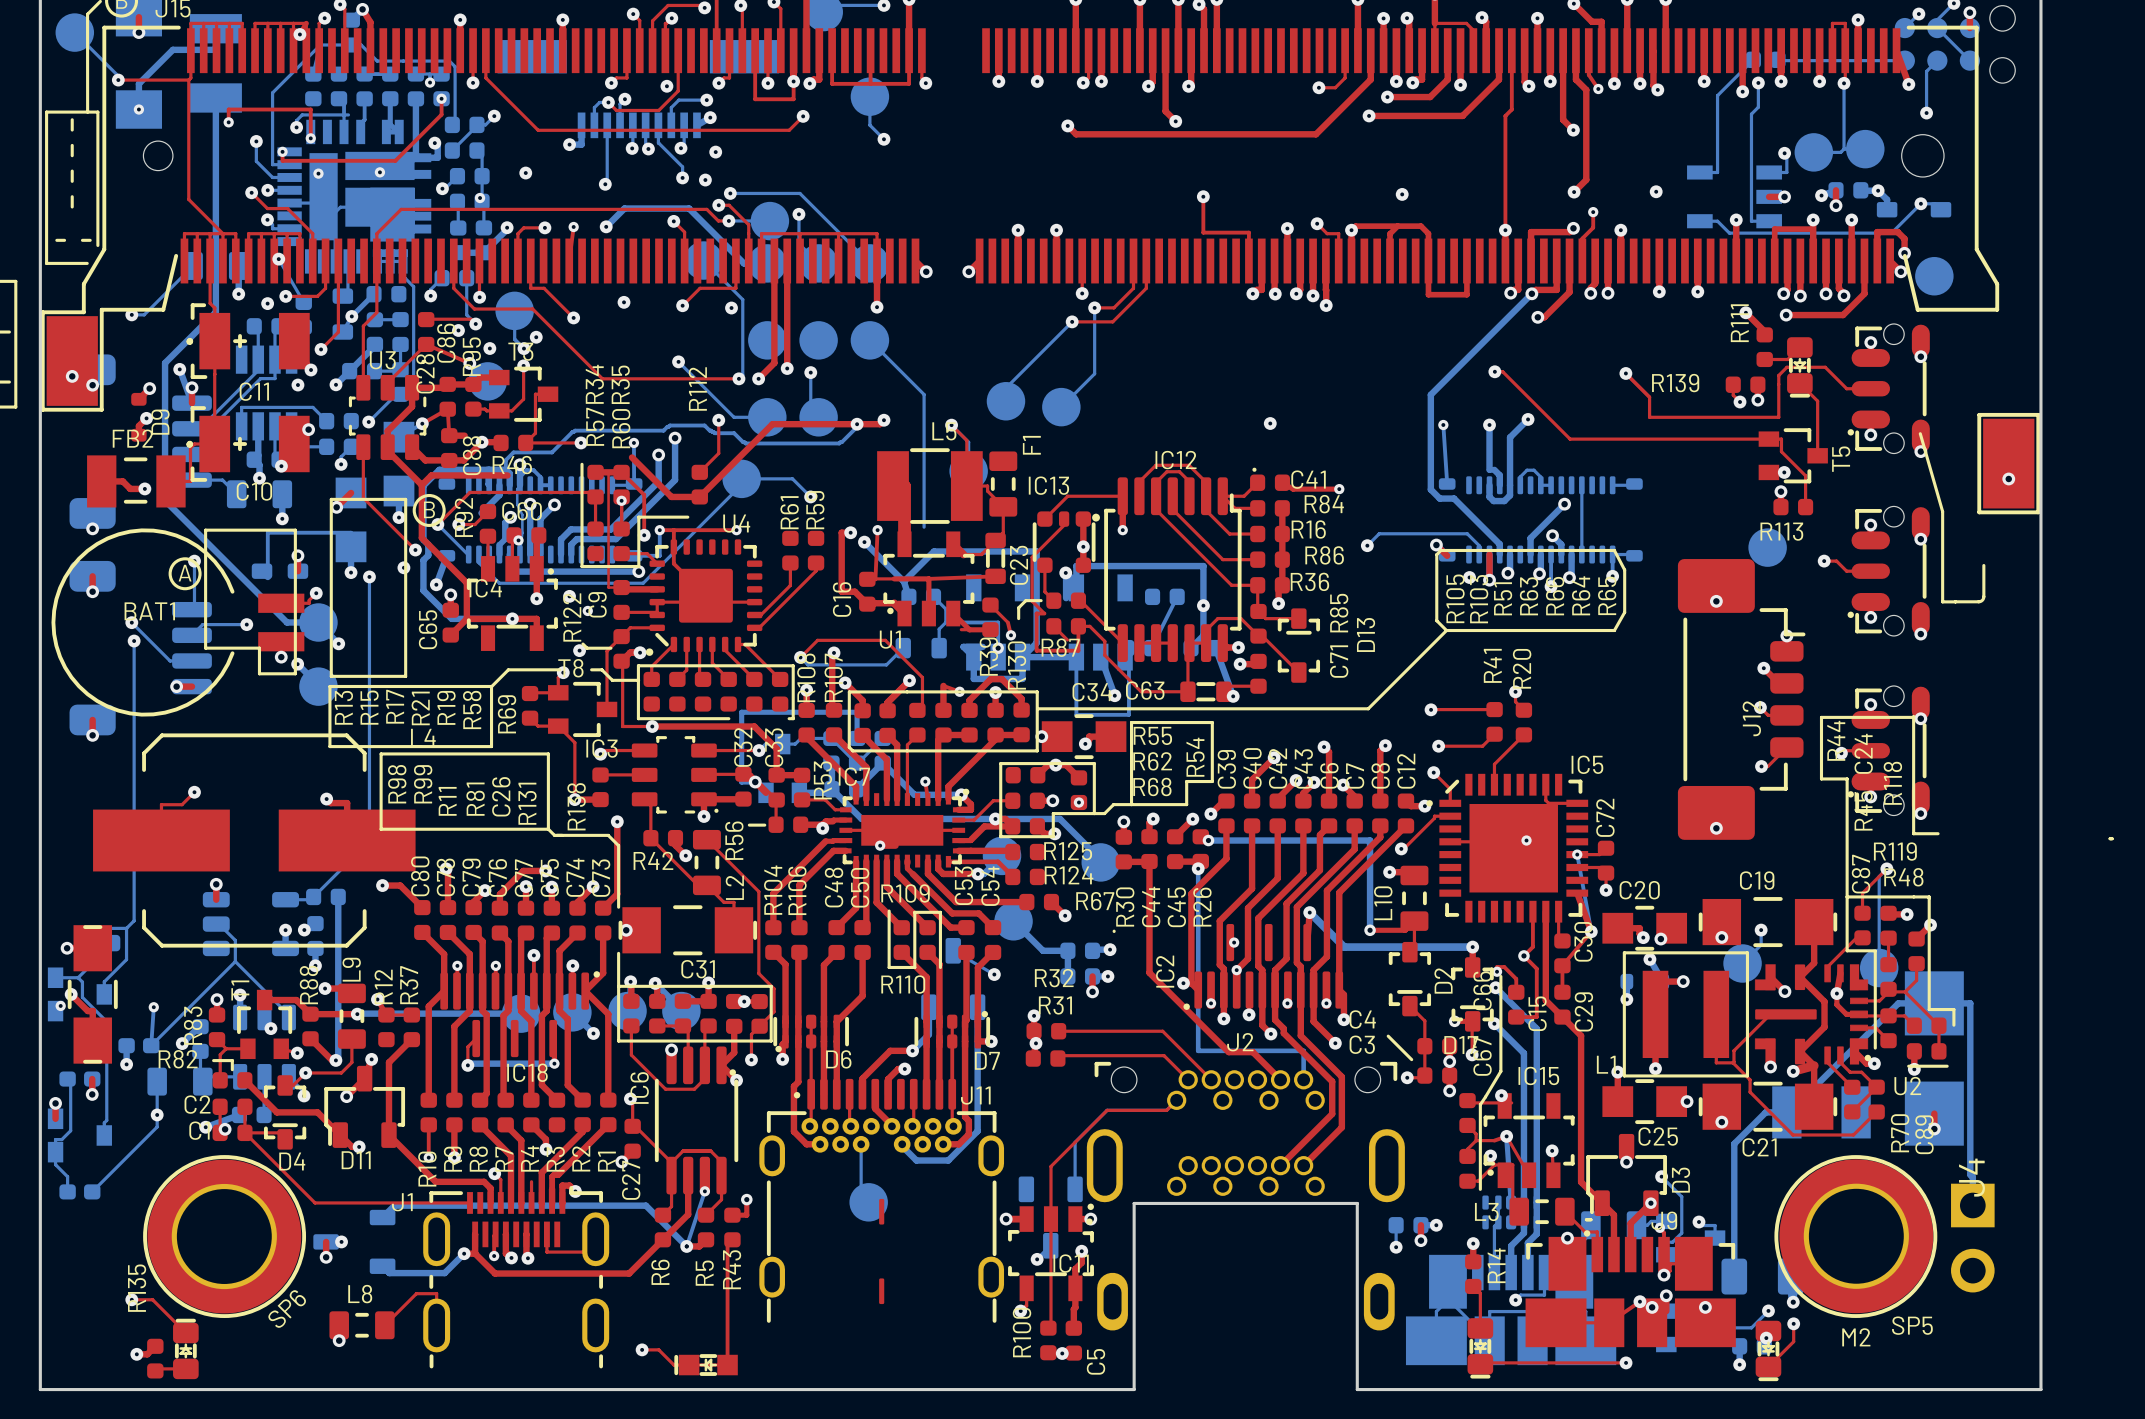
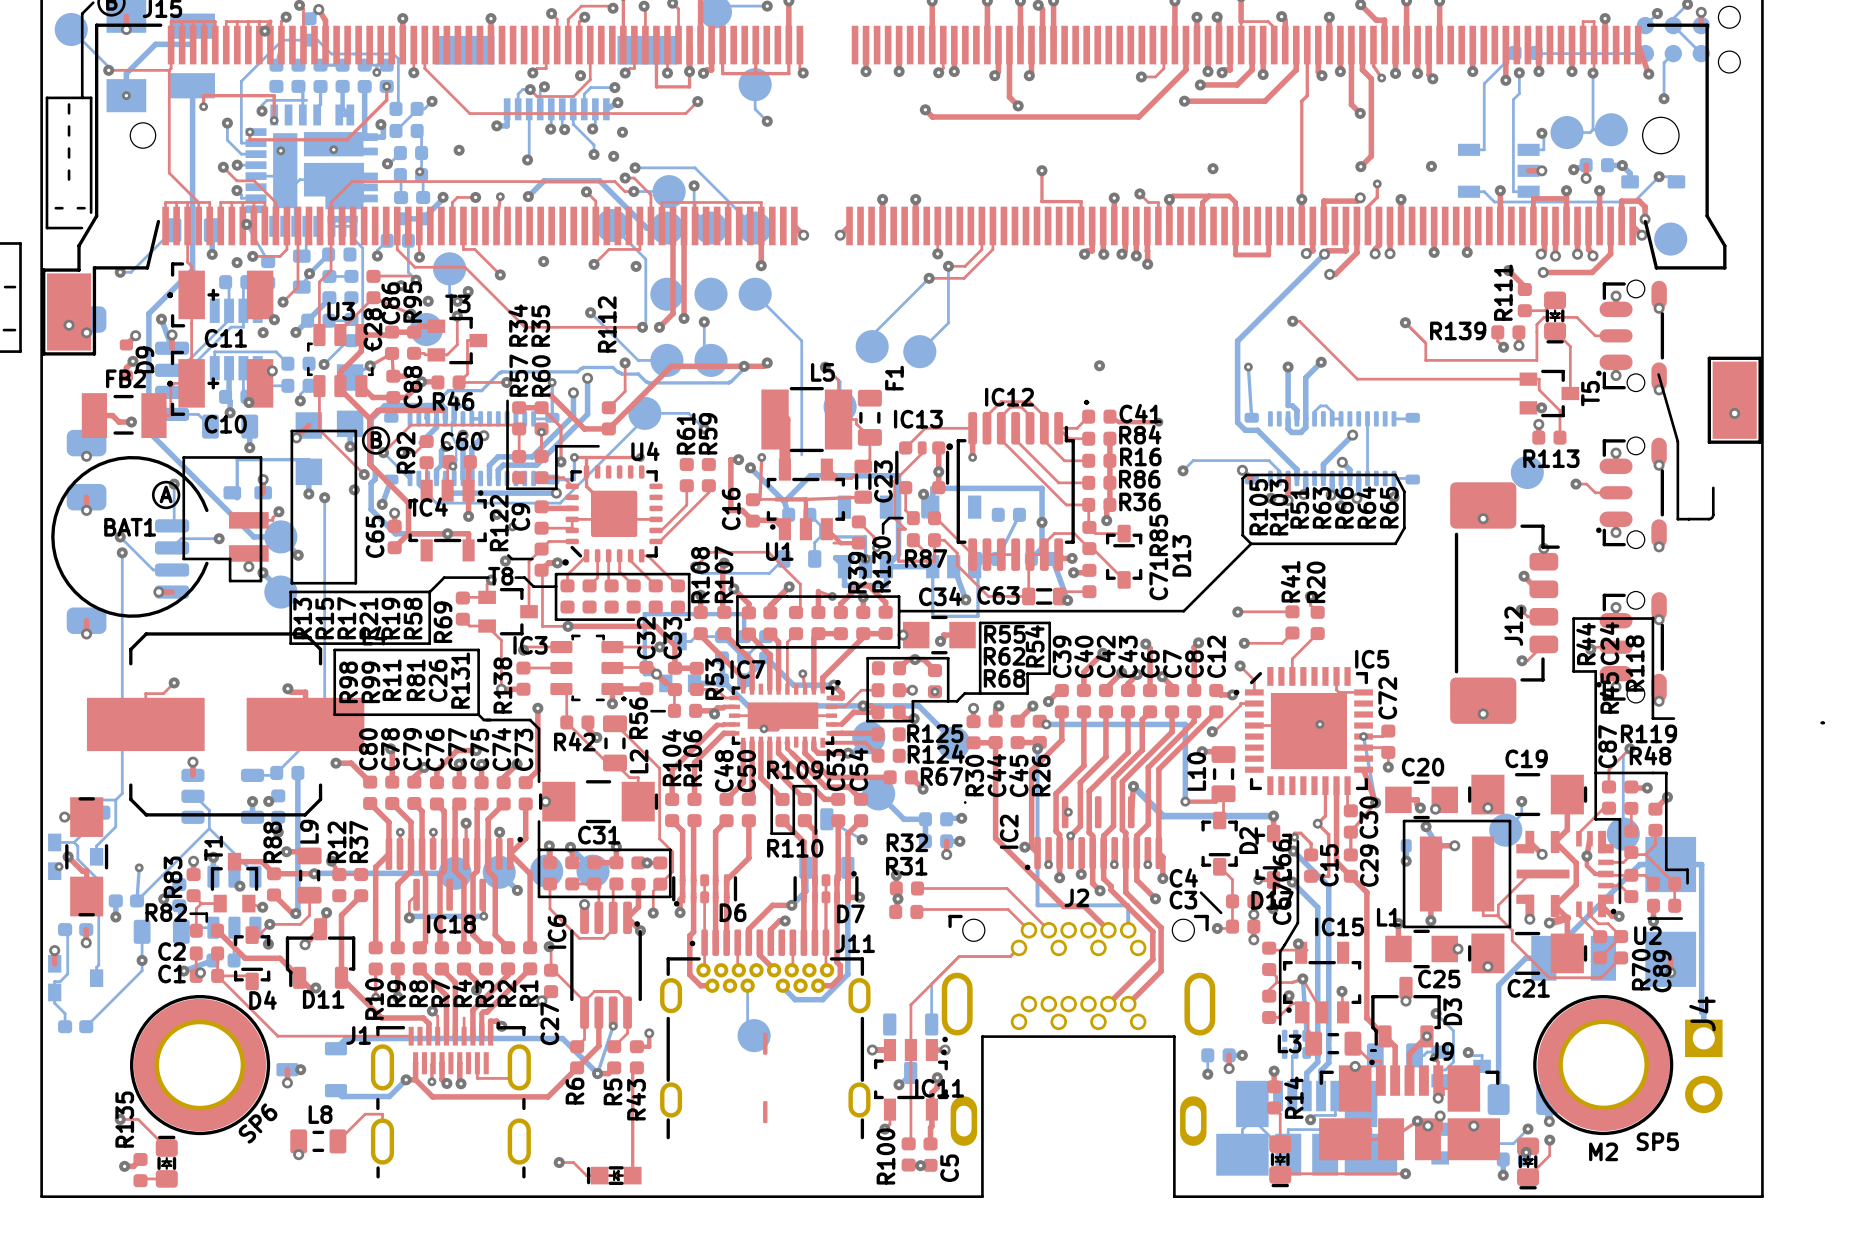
top track: (608, 472) (608, 587) (621, 587) -> none

